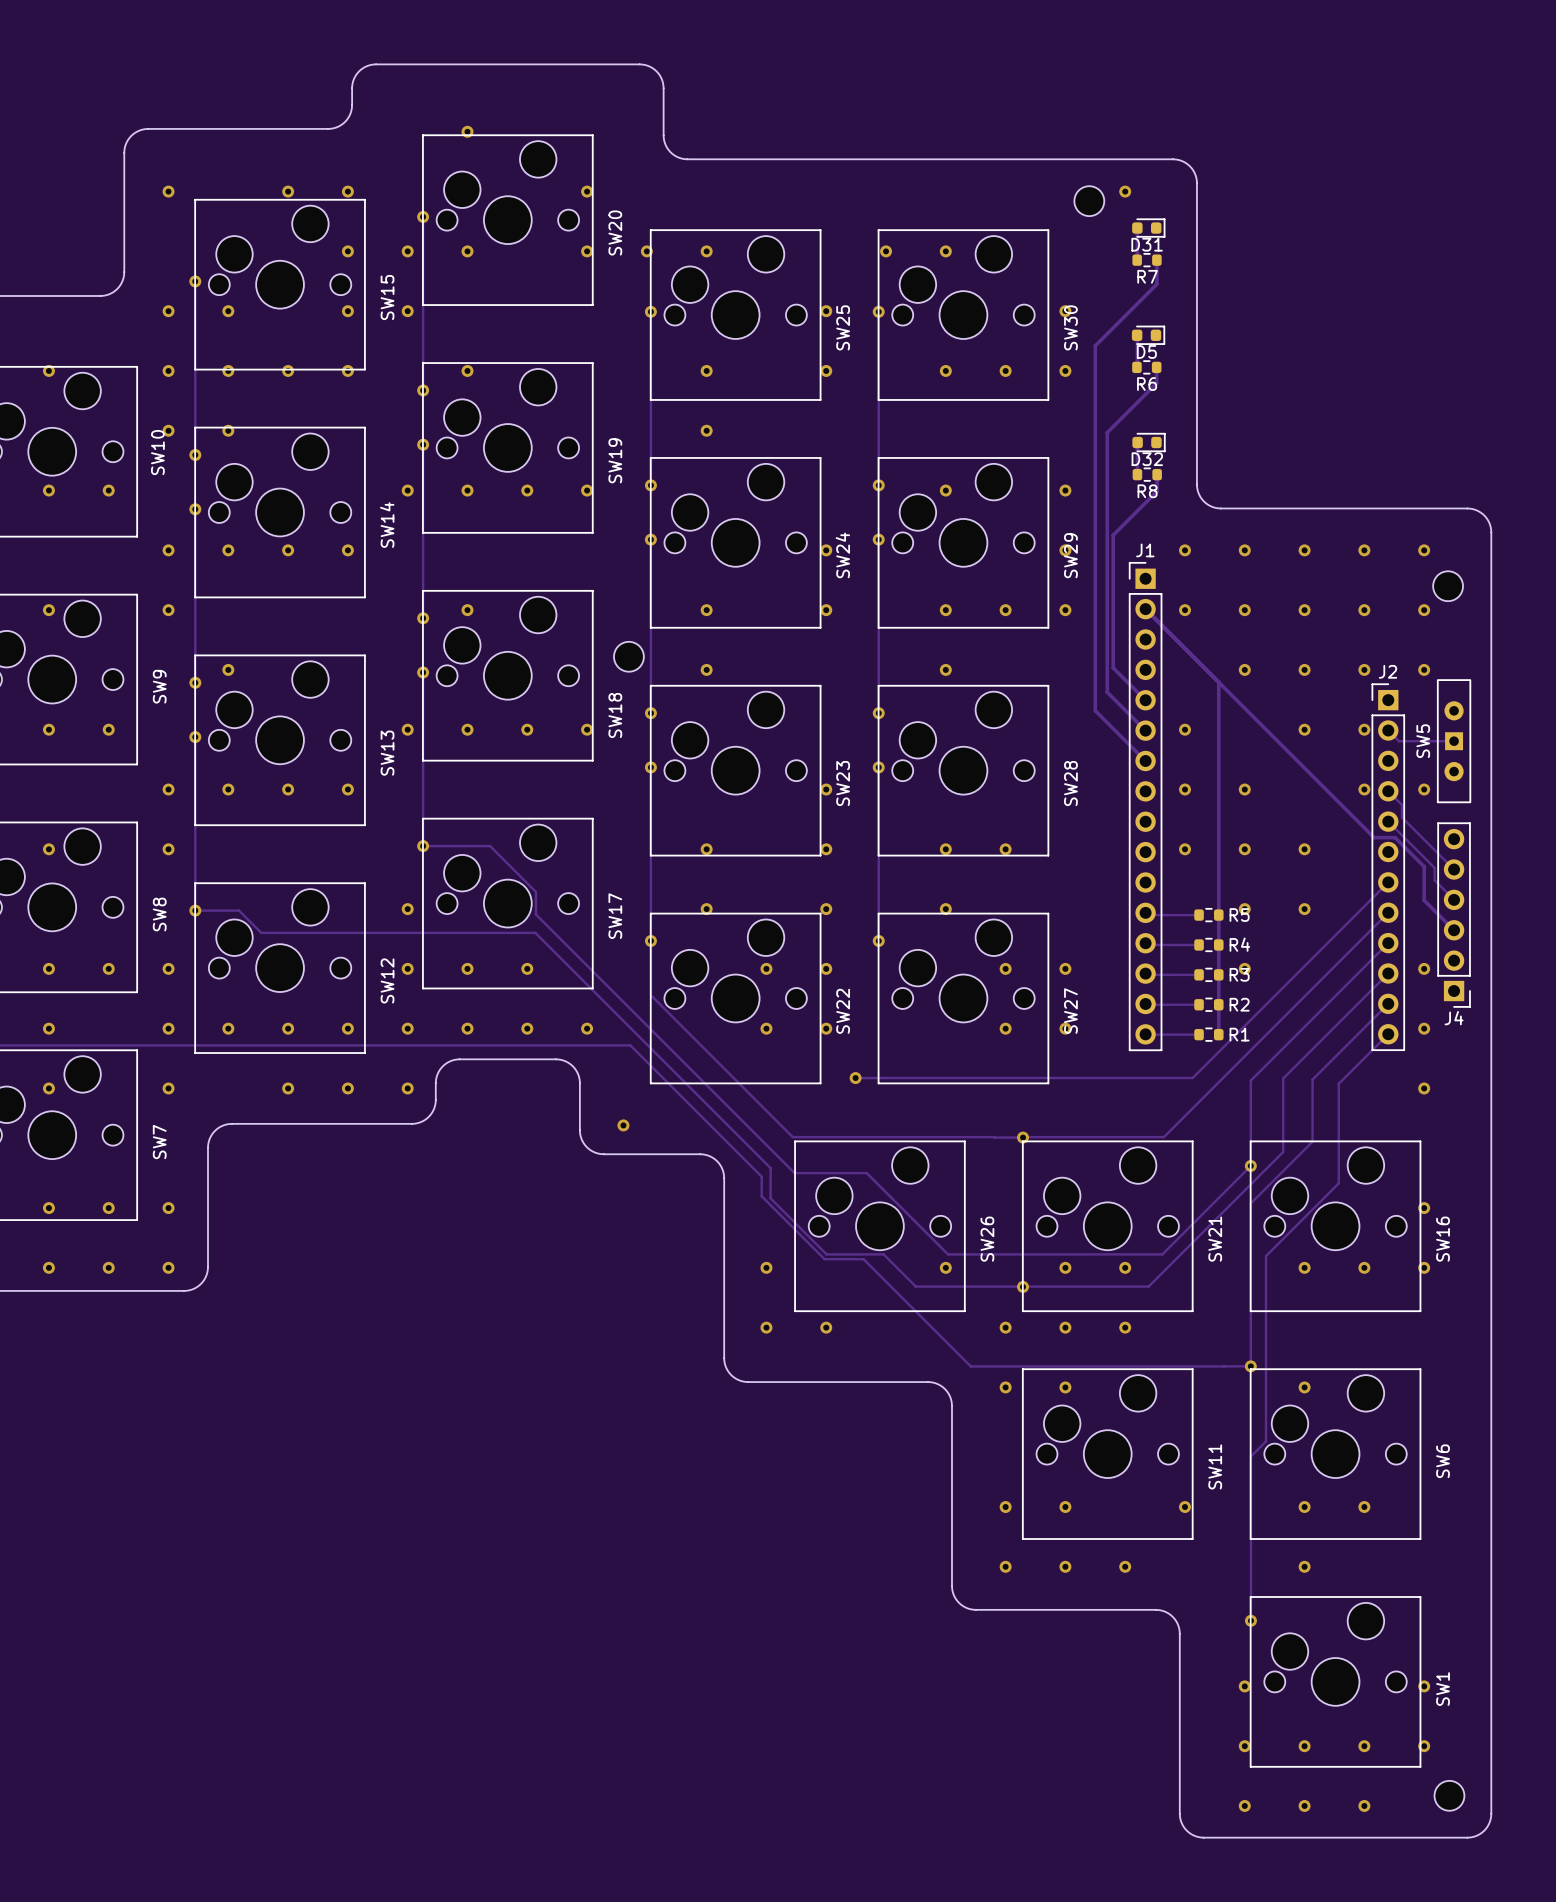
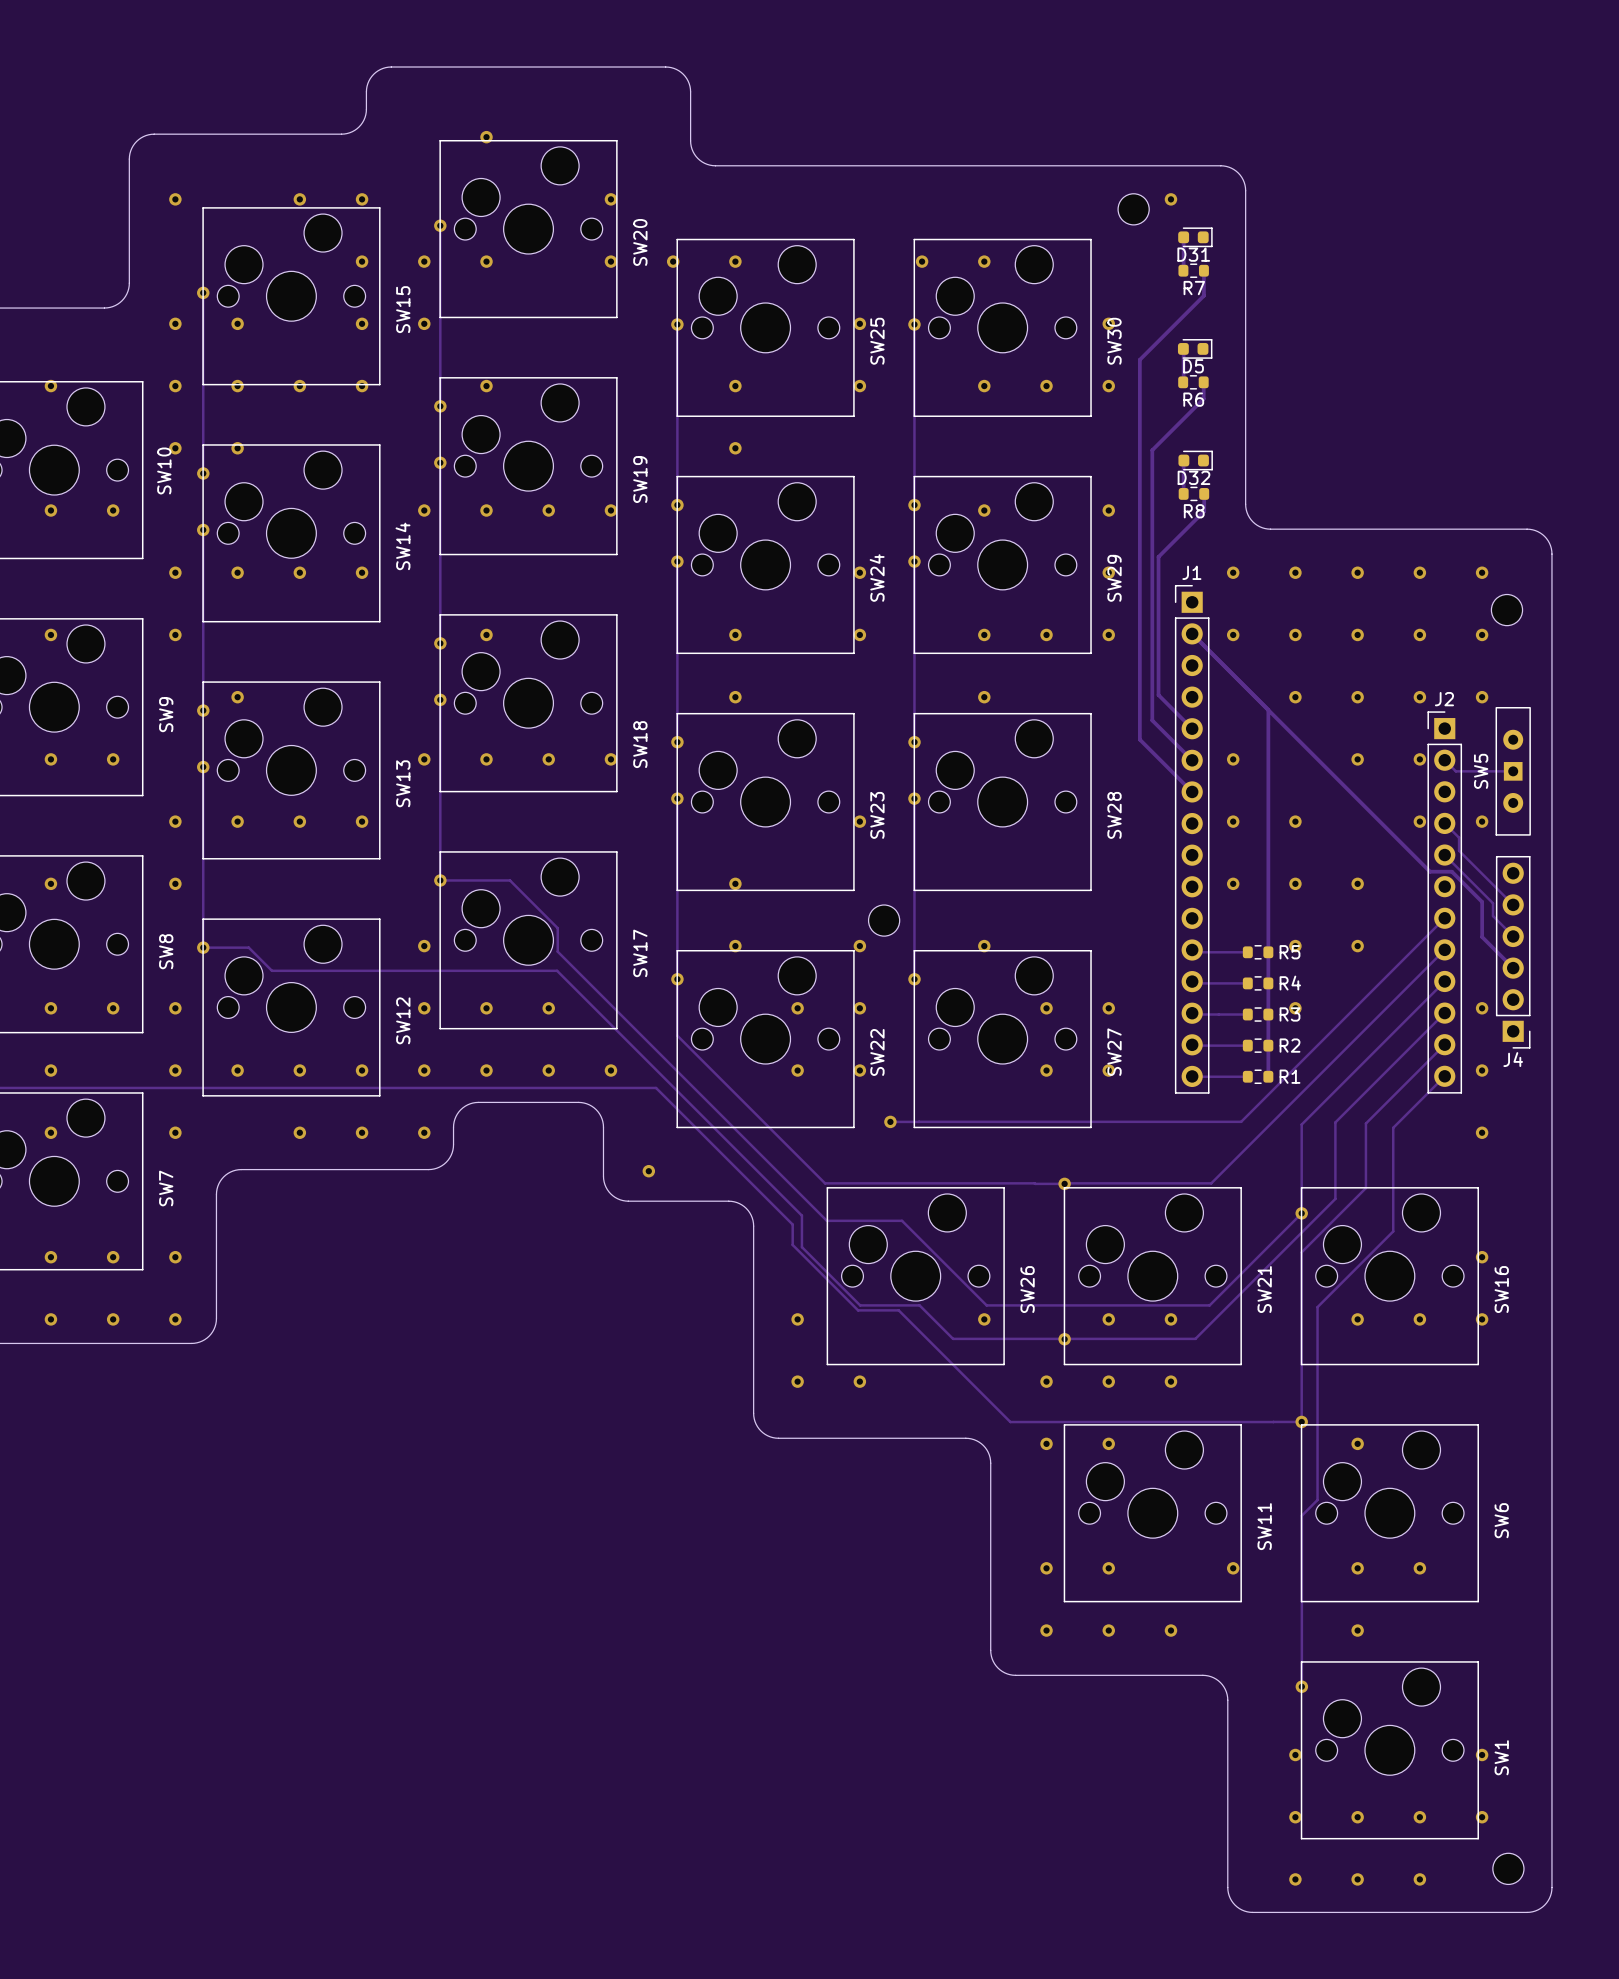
part: (628, 656) -> none
via: (826, 849) -> none
via: (945, 849) -> none
via: (1005, 849) -> none
part: none -> (884, 920)

